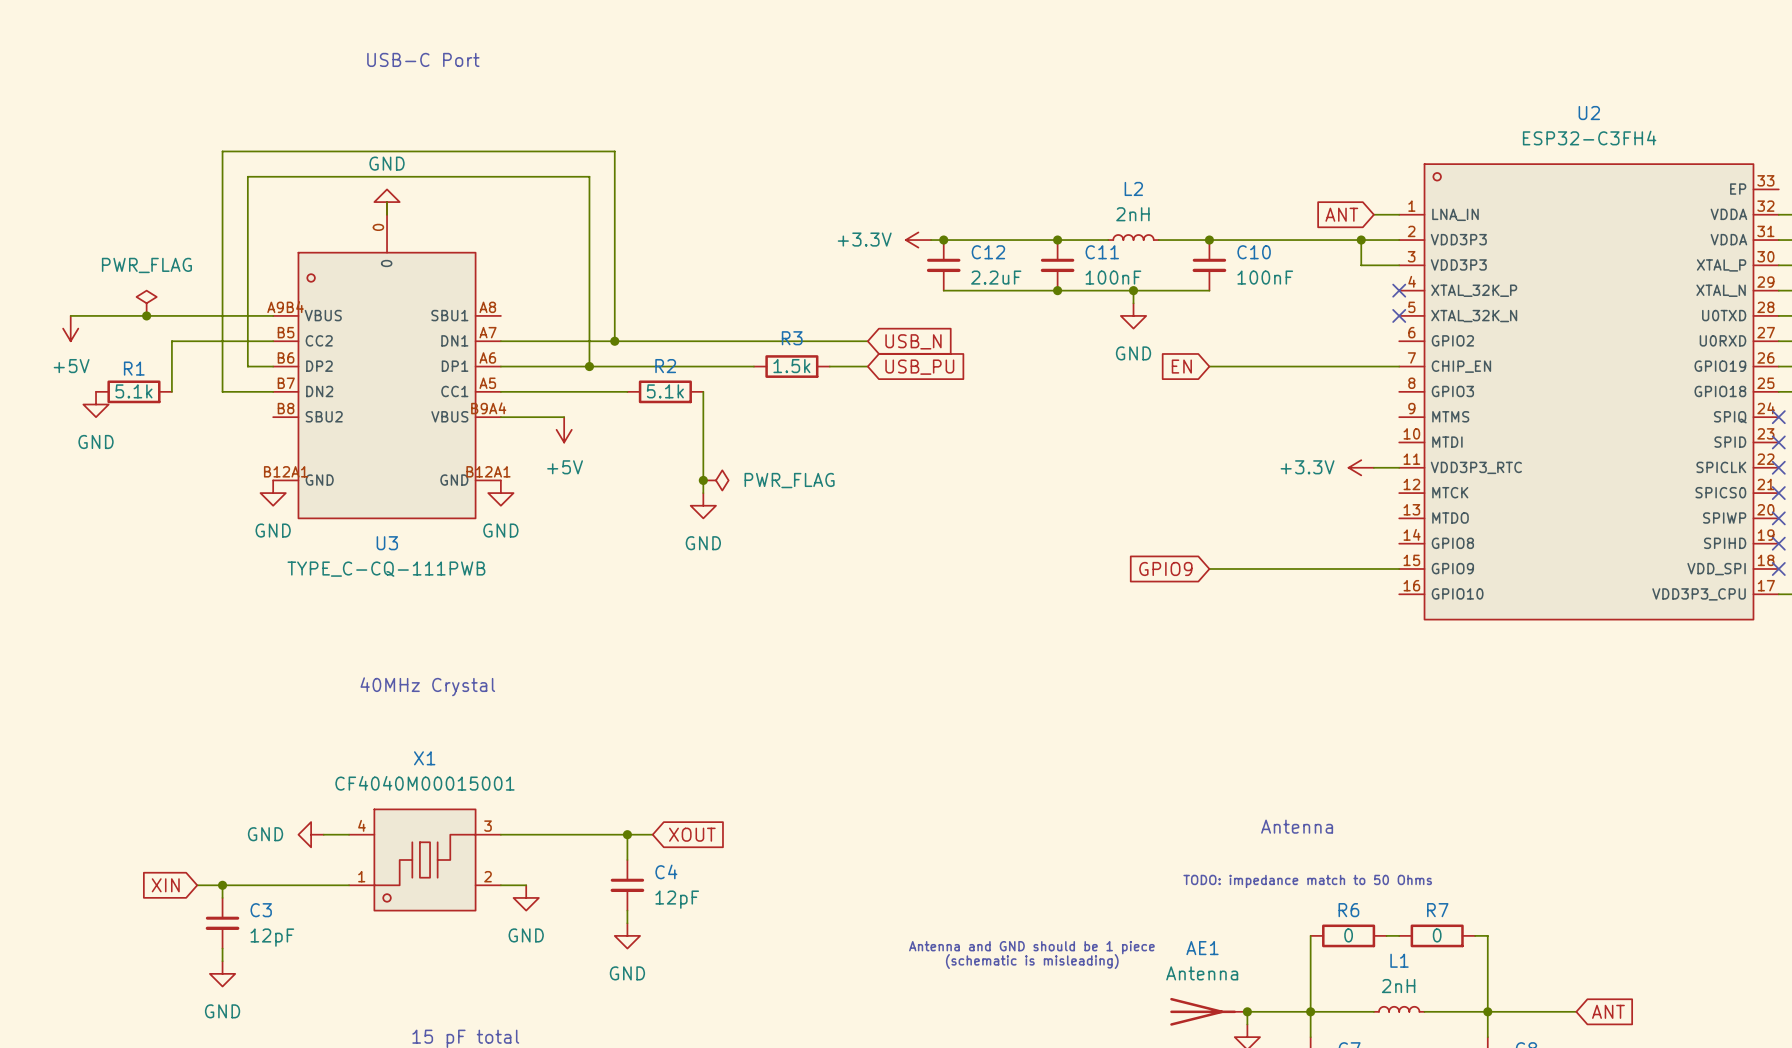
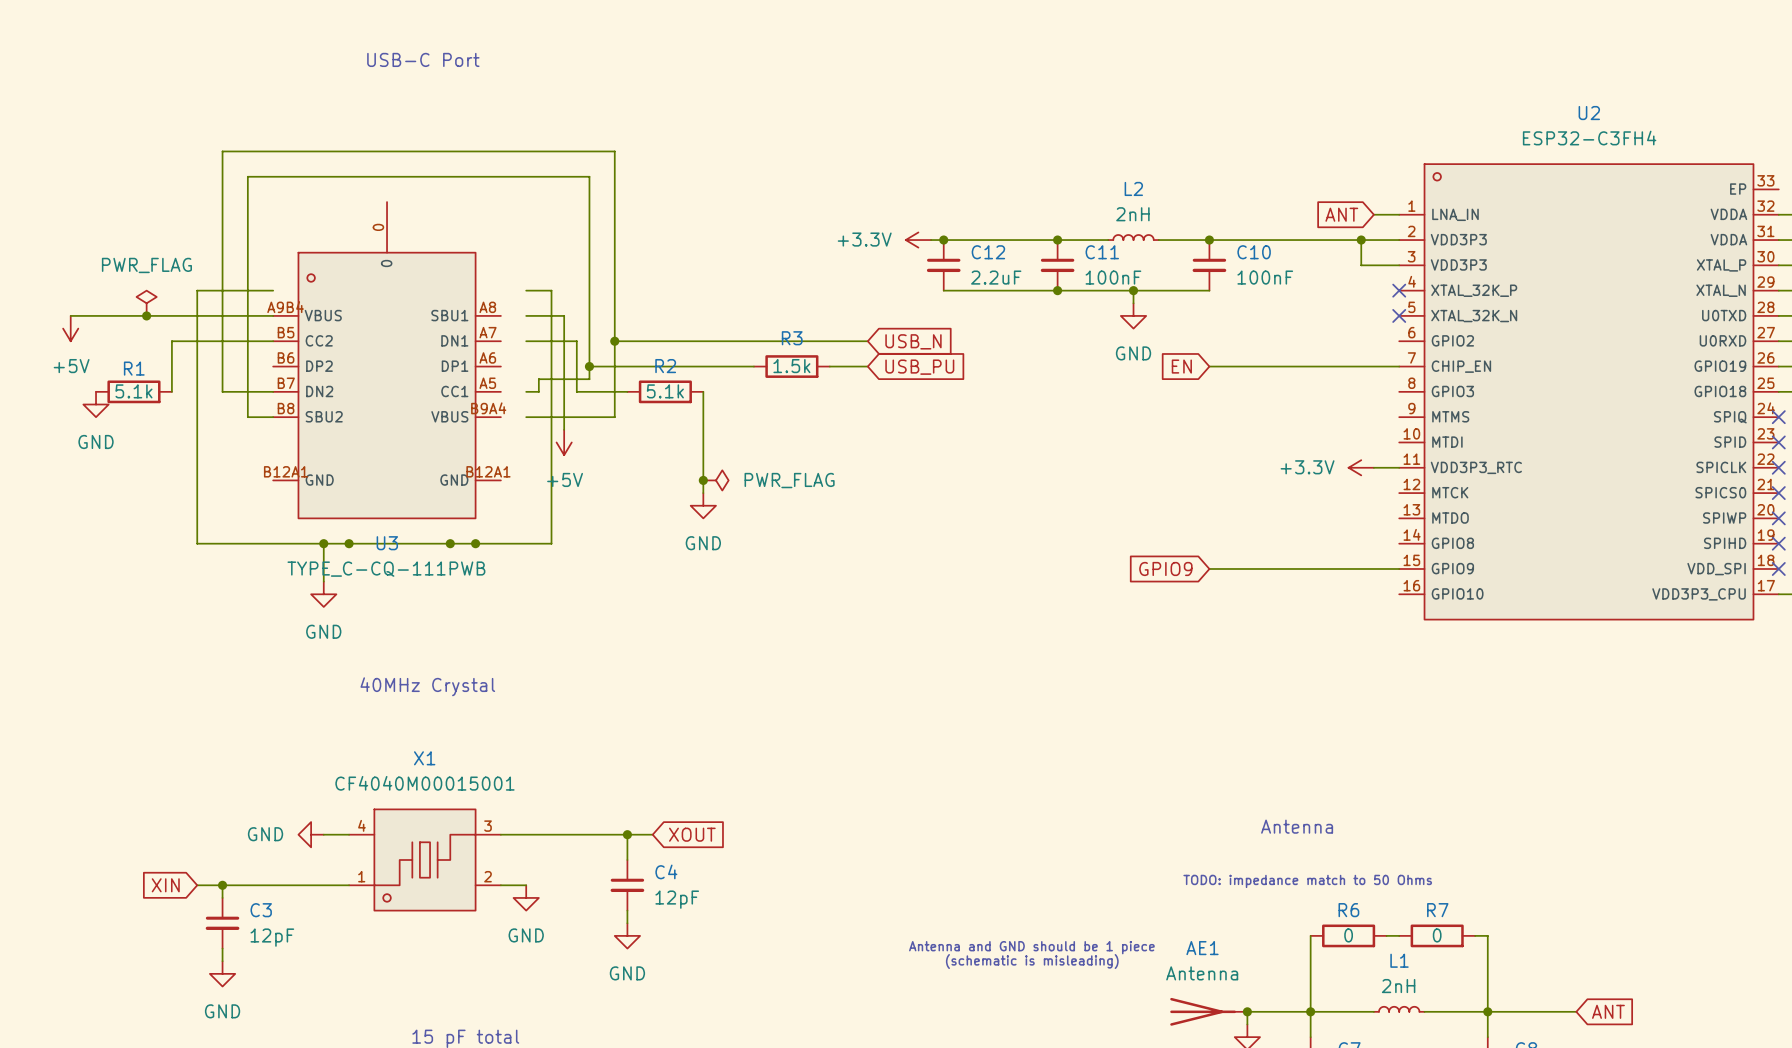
power symbol: GND (387, 202) -> none
wire: none -> (273, 290) (197, 290) (197, 543) (551, 543) (551, 290) (526, 290)
wire: none -> (526, 315) (564, 315) (564, 429)
wire: (500, 341) (526, 341) -> none
wire: (576, 341) (614, 341) -> (576, 341) (576, 391)
wire: none -> (614, 341) (614, 417) (564, 417)
wire: (247, 366) (273, 366) -> (247, 366) (247, 417) (273, 417)
wire: (500, 366) (589, 366) -> none
wire: (500, 391) (526, 391) -> none
wire: (538, 391) (576, 391) -> (538, 391) (538, 379) (589, 379) (589, 366)
wire: (500, 417) (526, 417) -> none
power symbol position: +5V (564, 429) -> +5V (564, 442)
power symbol: GND (273, 493) -> none
power symbol: GND (500, 493) -> none
wire: none -> (323, 543) (323, 581)
junction: none -> (323, 543)
junction: none -> (349, 543)
junction: none -> (450, 543)
junction: none -> (475, 543)
power symbol: none -> GND (323, 594)

